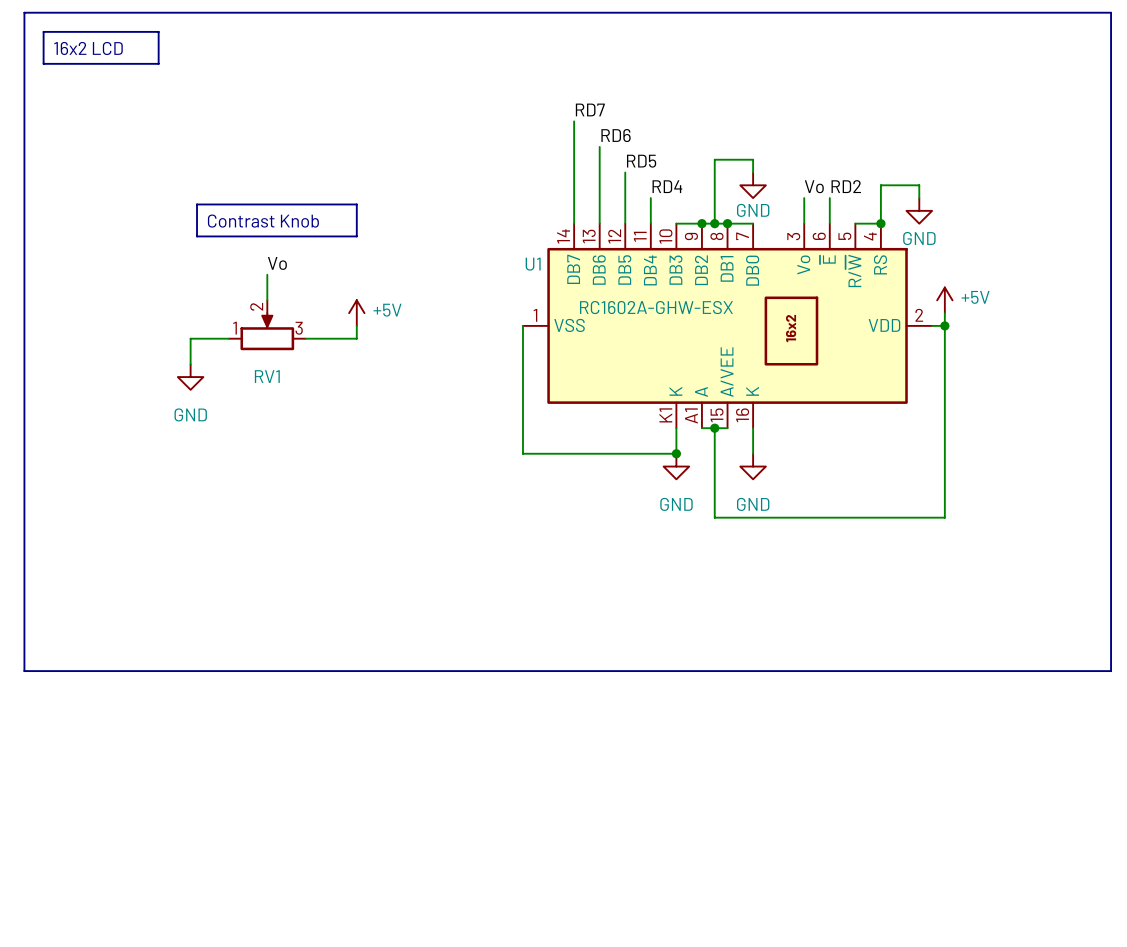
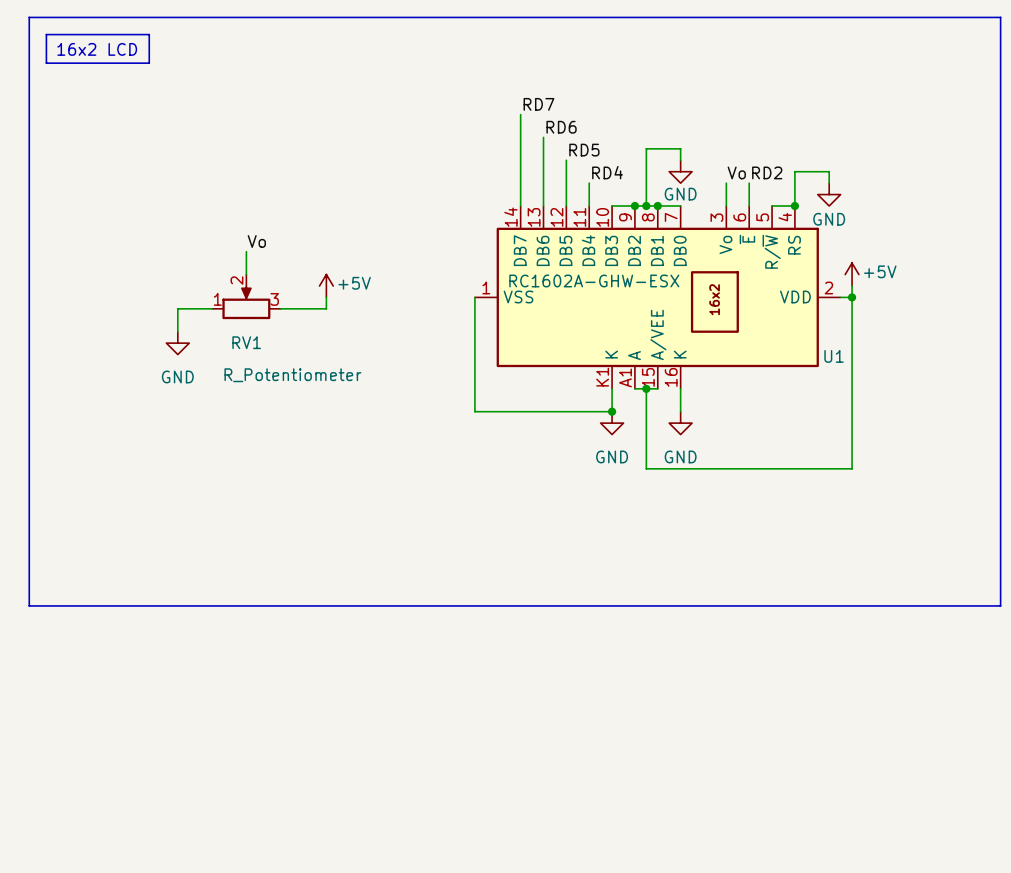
line: (197, 204) (356, 204) (356, 236) (197, 236) (197, 204) -> none
text: Contrast Knob (263, 221) -> none
U1 name position: U1 (533, 264) -> U1 (834, 356)
RV1 value: none -> R_Potentiometer (292, 375)

